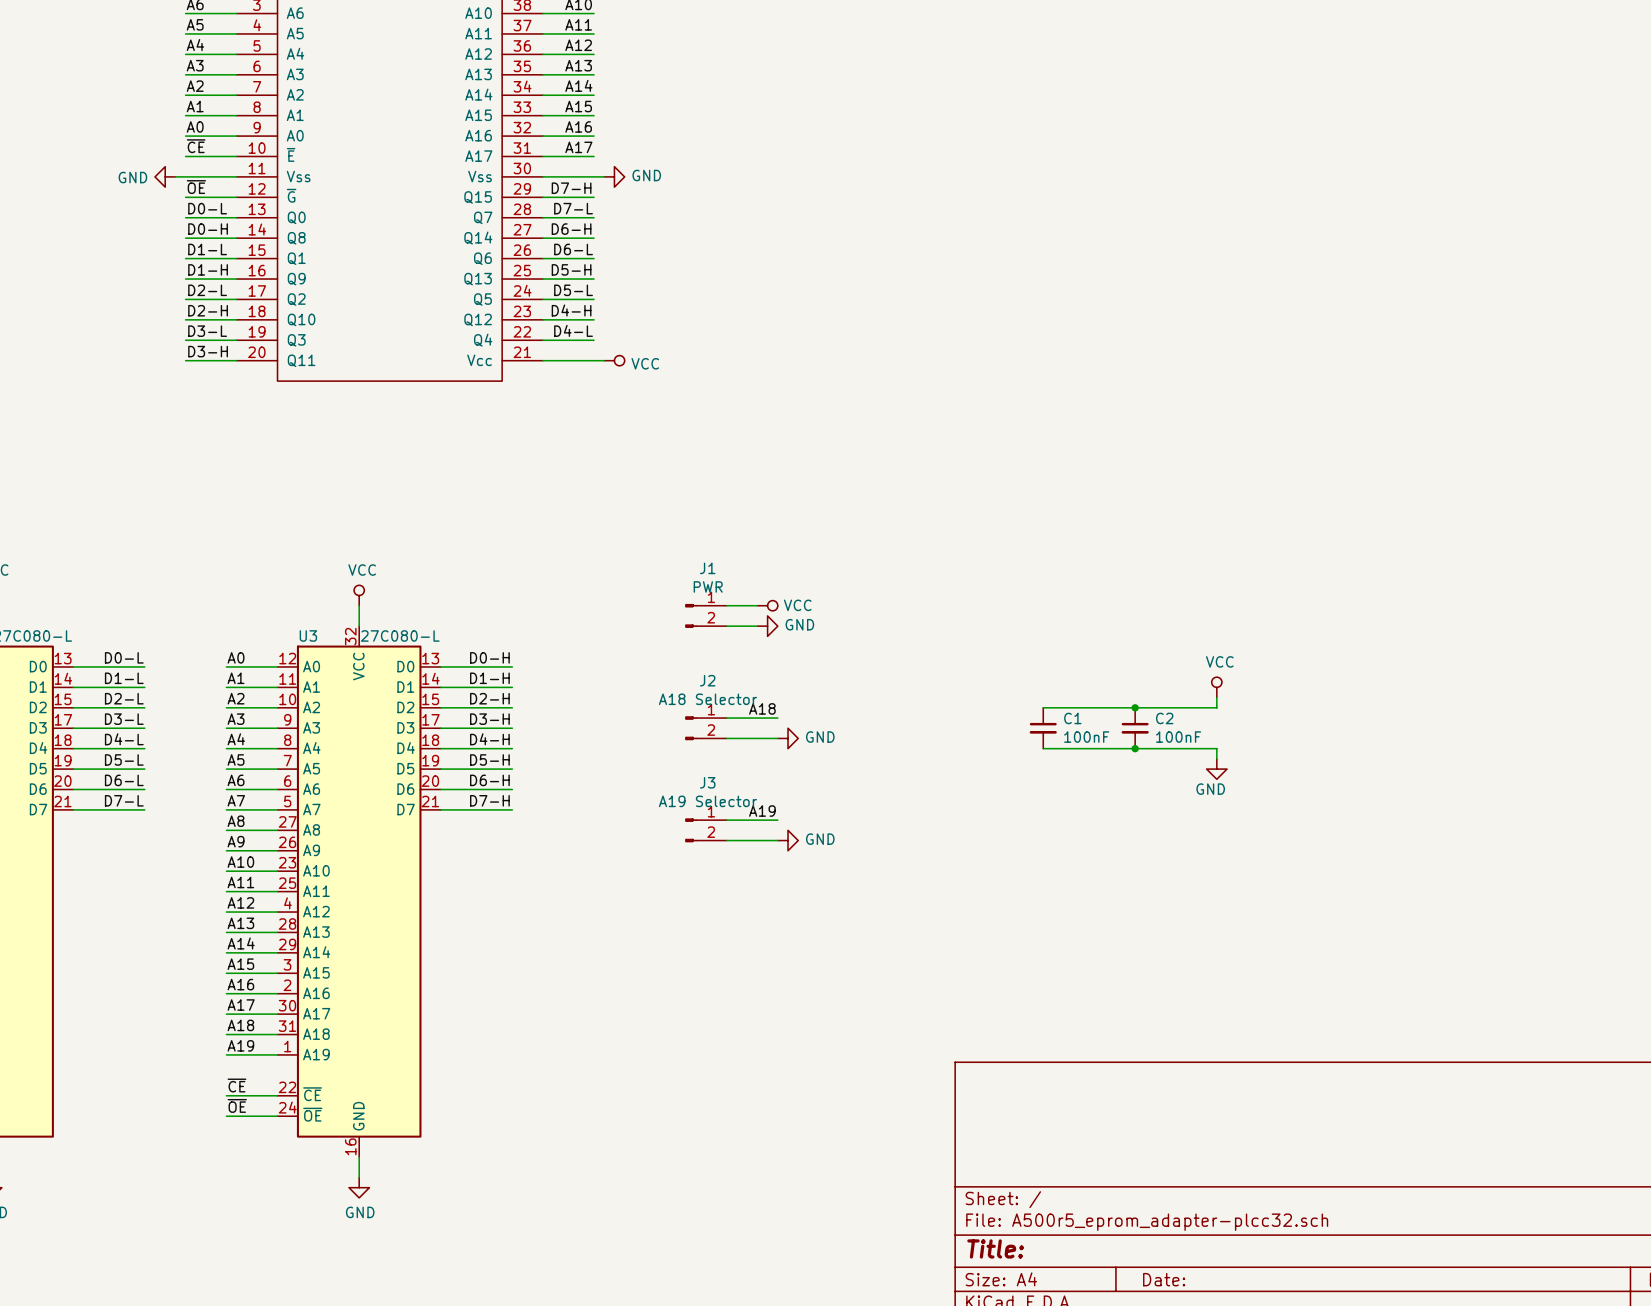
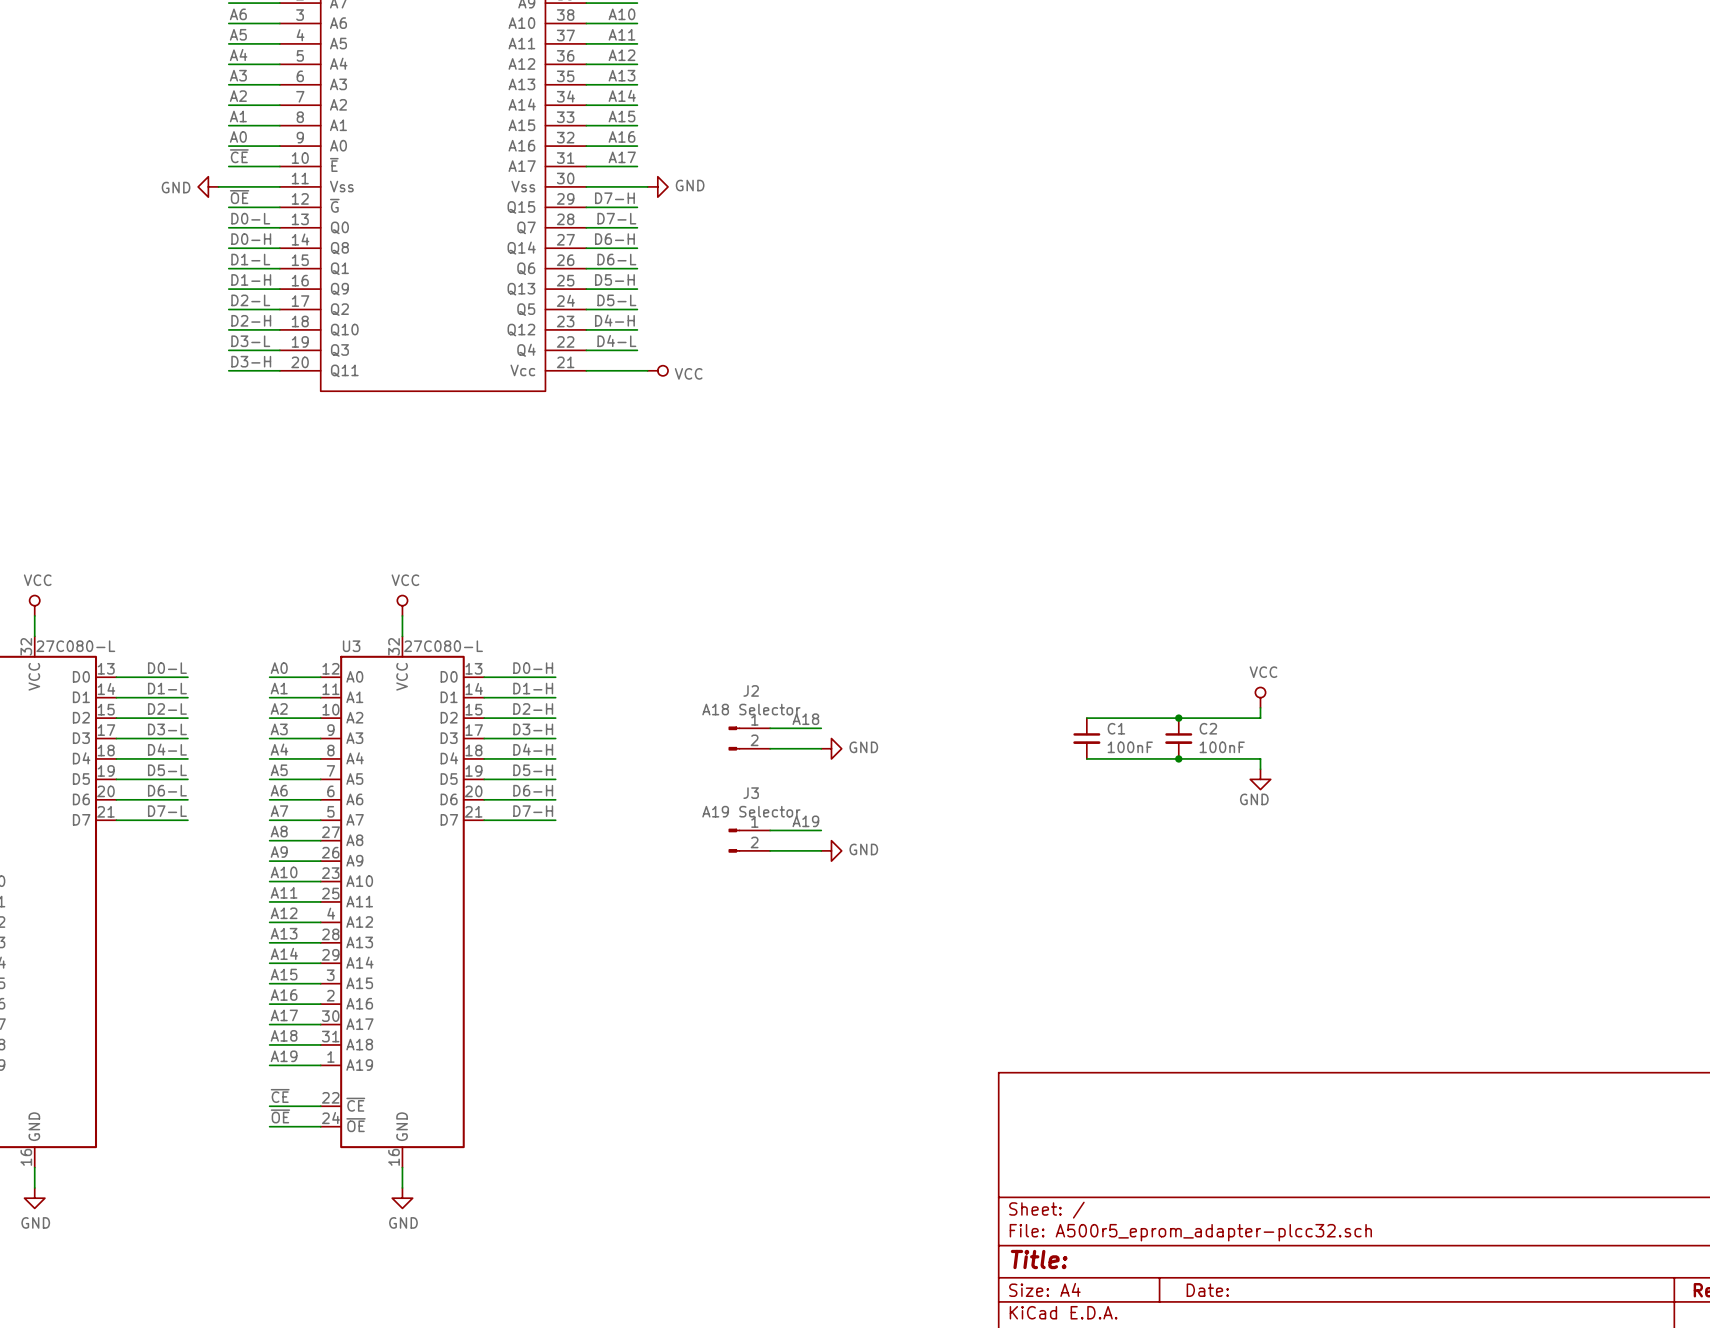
wire: (726, 605) (757, 605) -> none
power symbol: VCC (767, 605) -> none
J1: PWR (706, 615) -> none
wire: (726, 626) (757, 626) -> none
power symbol: GND (767, 626) -> none

